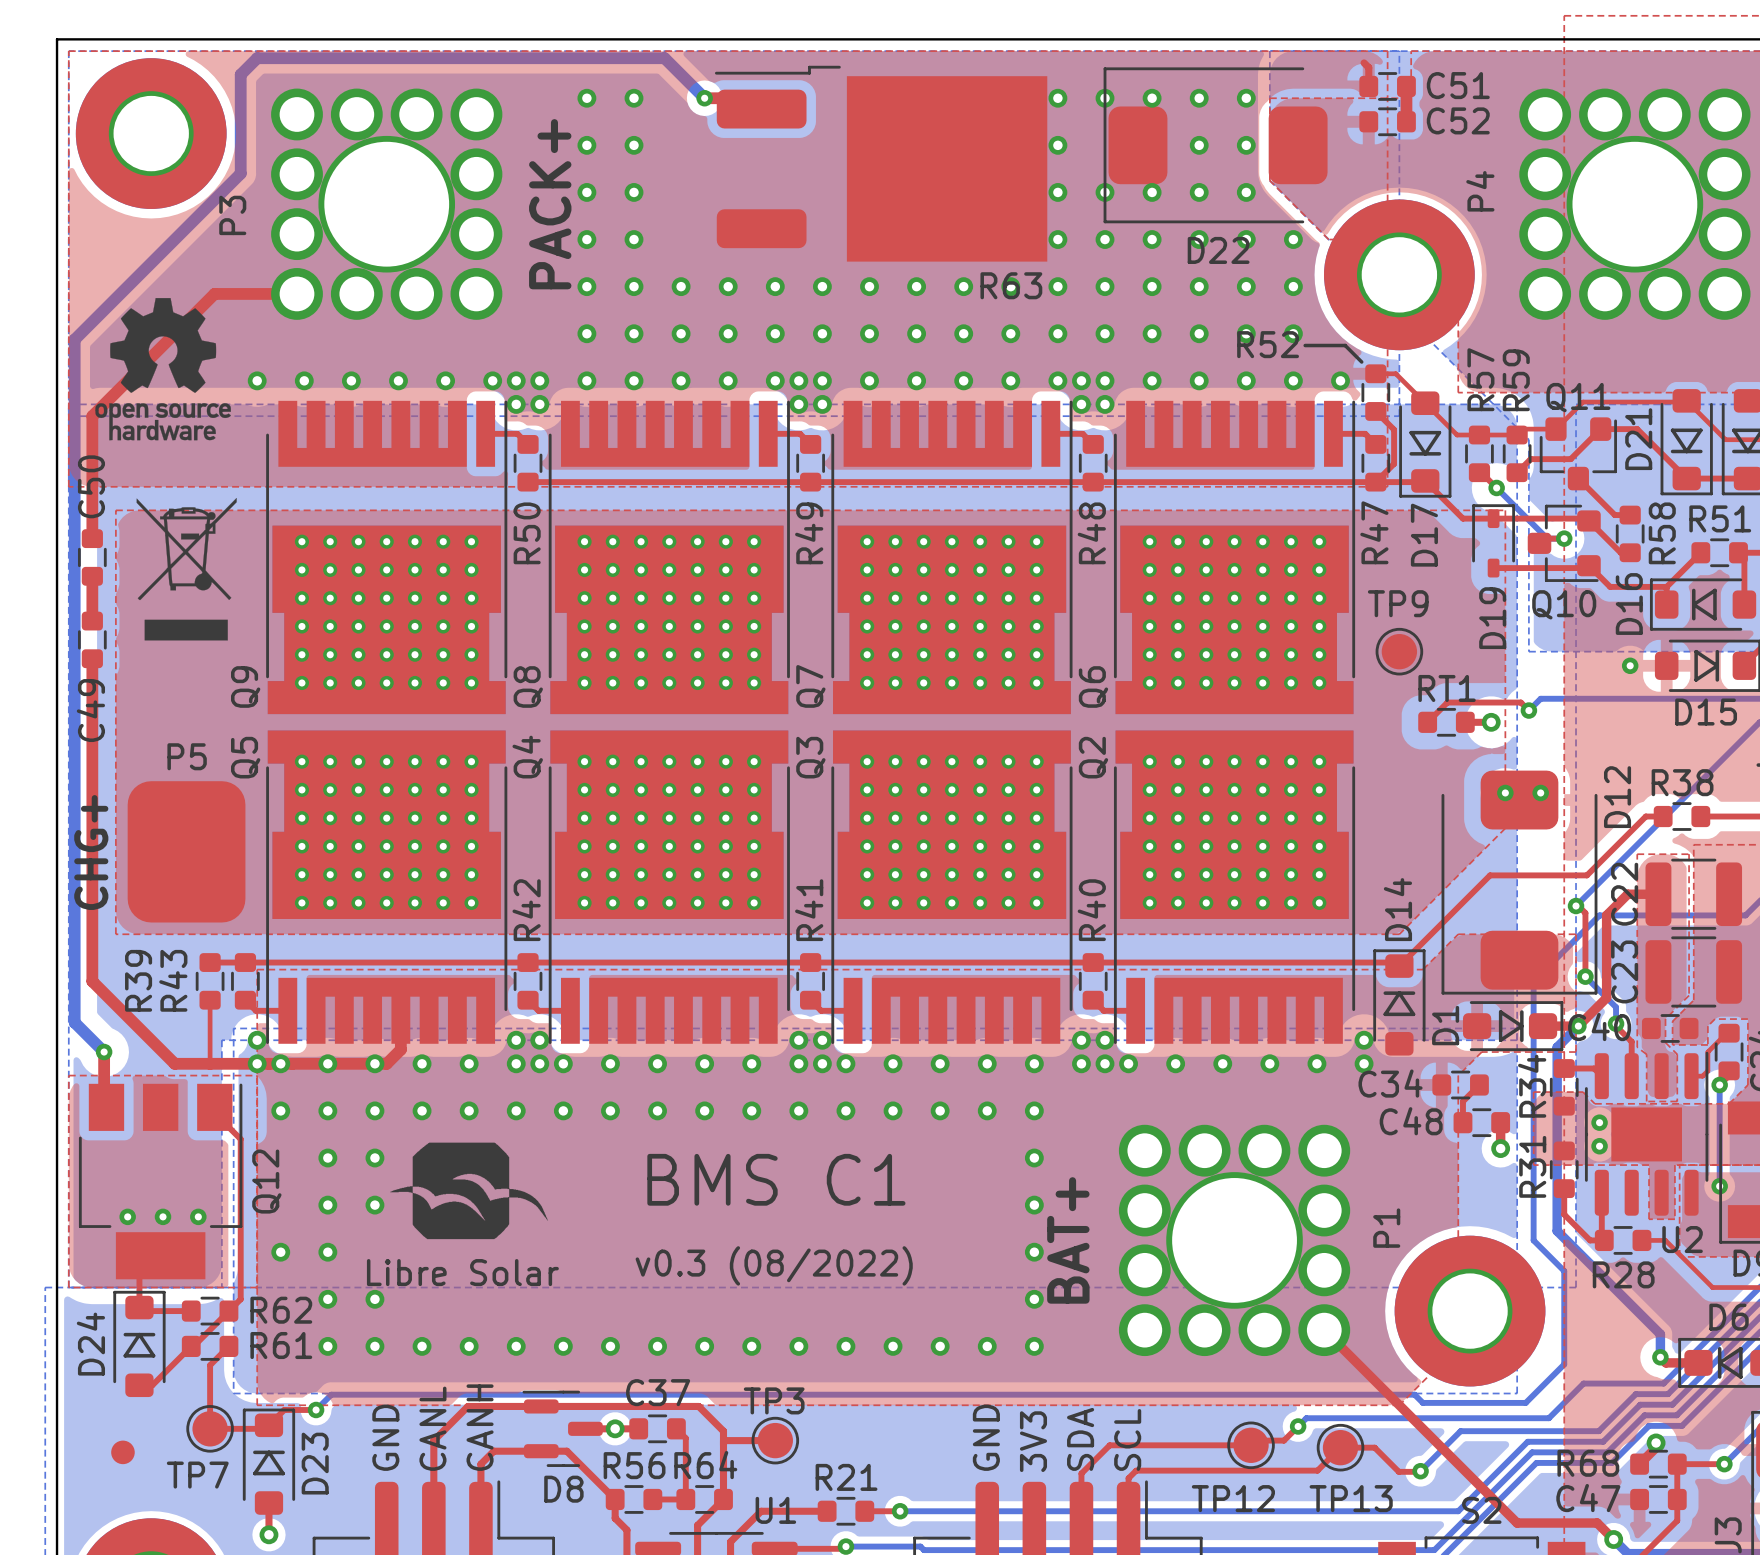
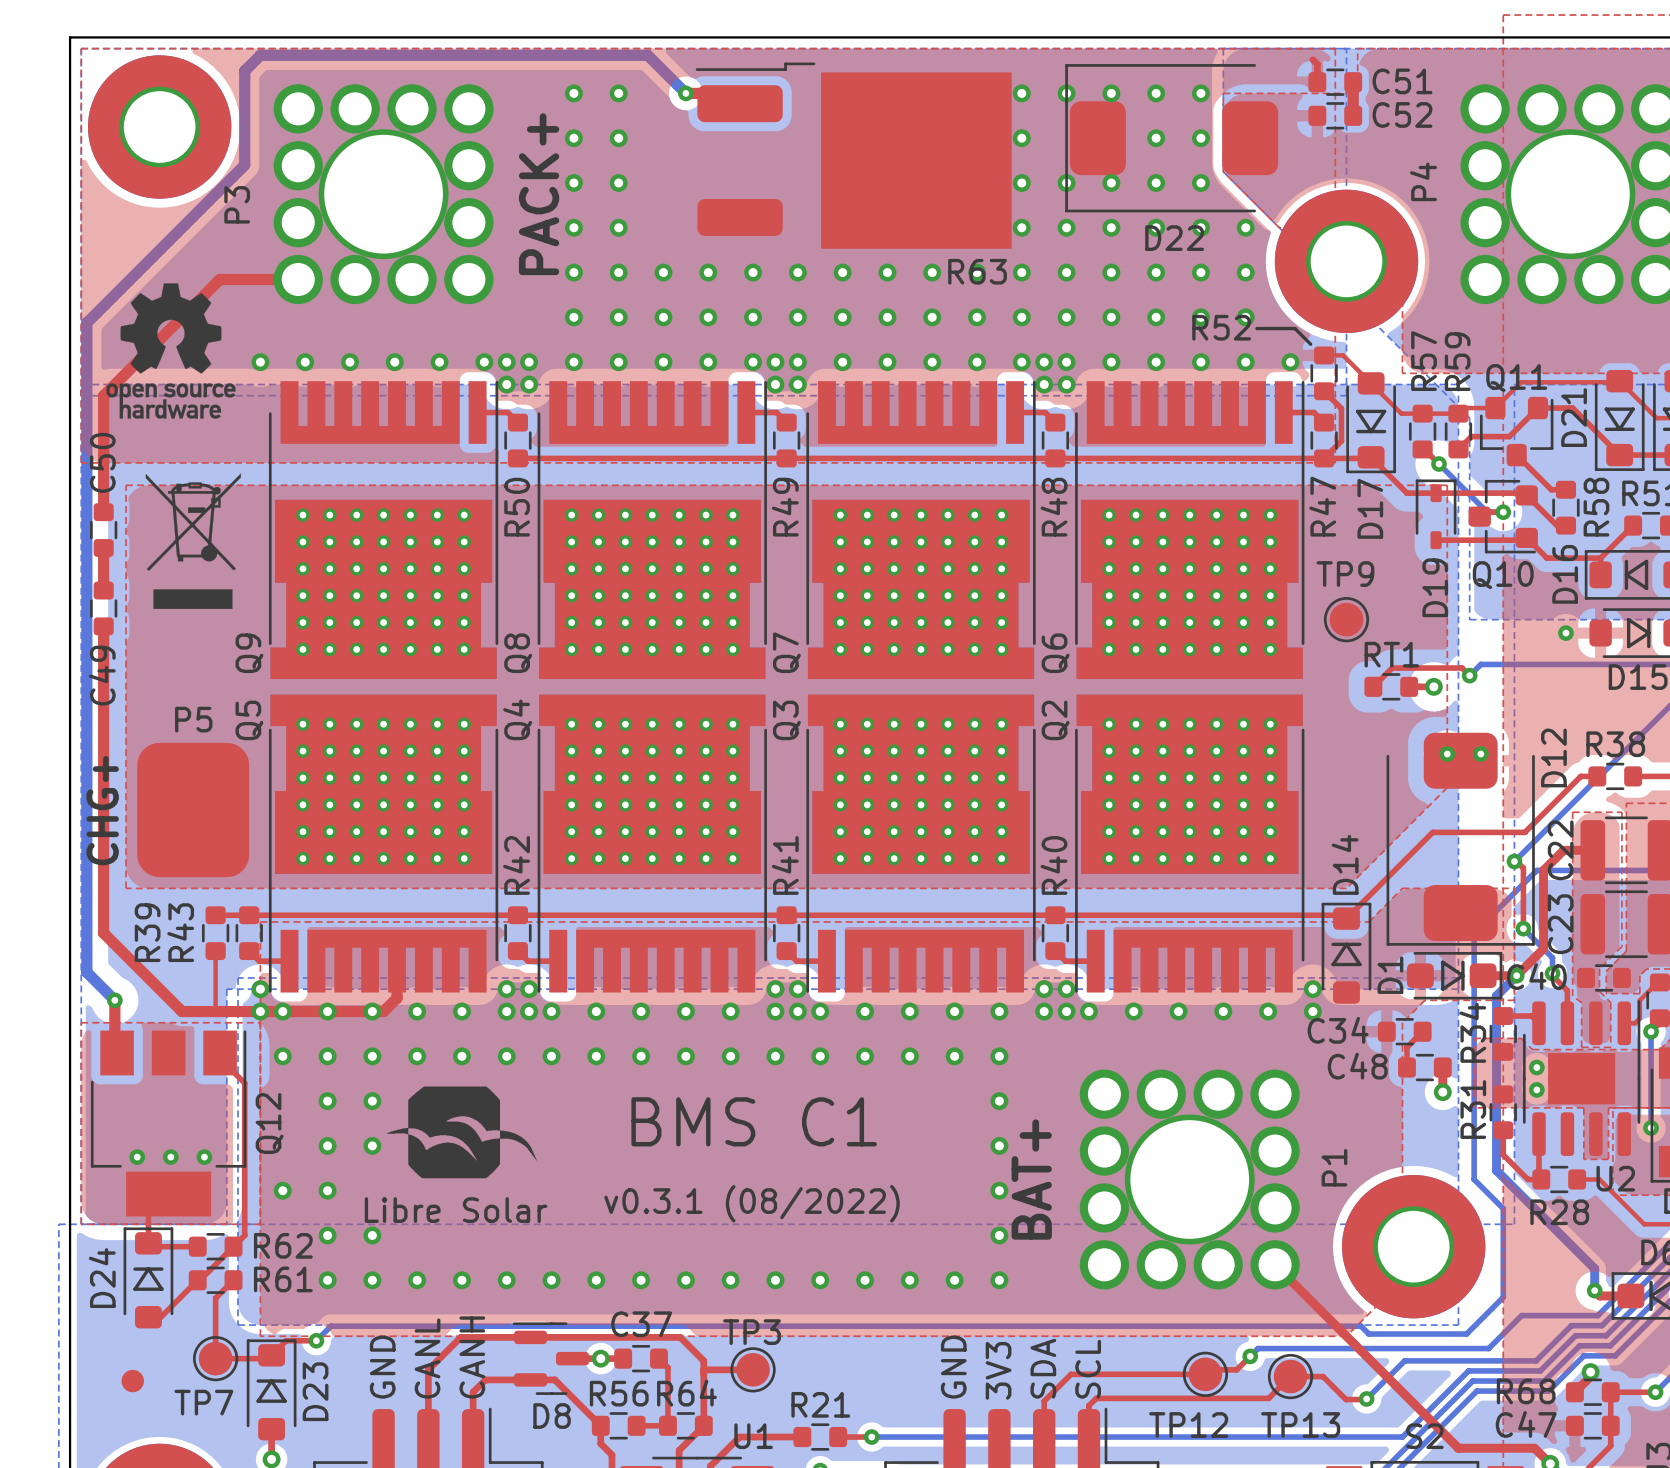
text: v0.3 (08/2022) (774, 1265) -> v0.3.1 (08/2022) (752, 1203)

